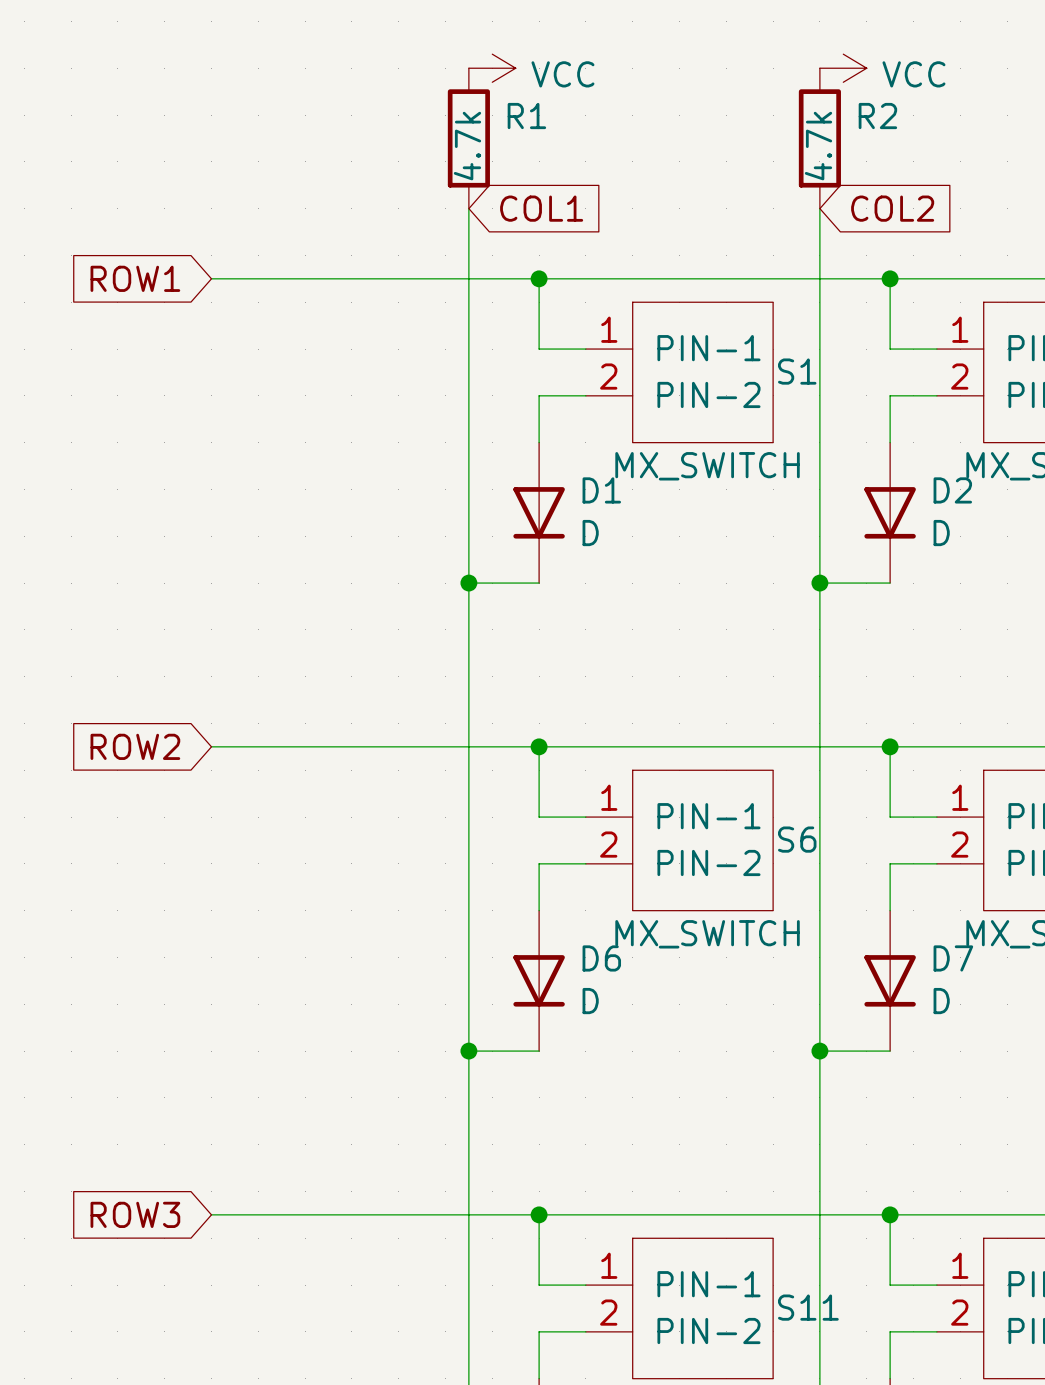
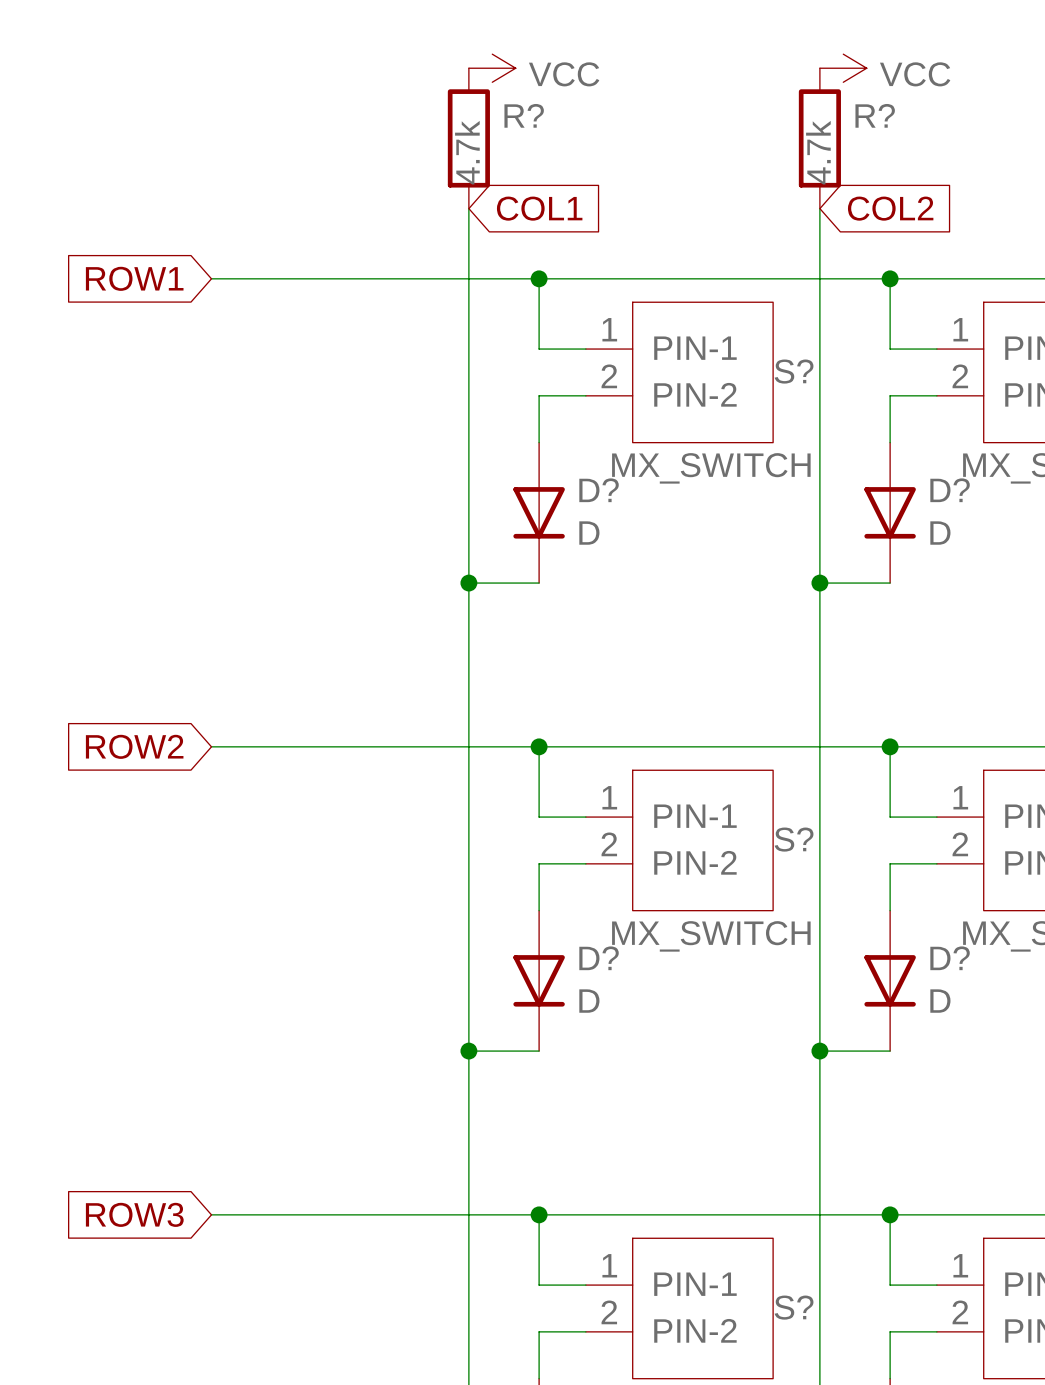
R1 name: R1 (526, 116) -> R? (524, 115)
R2 name: R2 (877, 116) -> R? (875, 115)
S1 name: S1 (797, 371) -> S? (794, 371)
D1 name: D1 (601, 490) -> D? (599, 490)
D2 name: D2 (952, 490) -> D? (950, 490)
S6 name: S6 (797, 839) -> S? (794, 839)
D6 name: D6 (601, 958) -> D? (599, 958)
D7 name: D7 (953, 958) -> D? (950, 958)
S11 name: S11 (808, 1307) -> S? (794, 1307)

